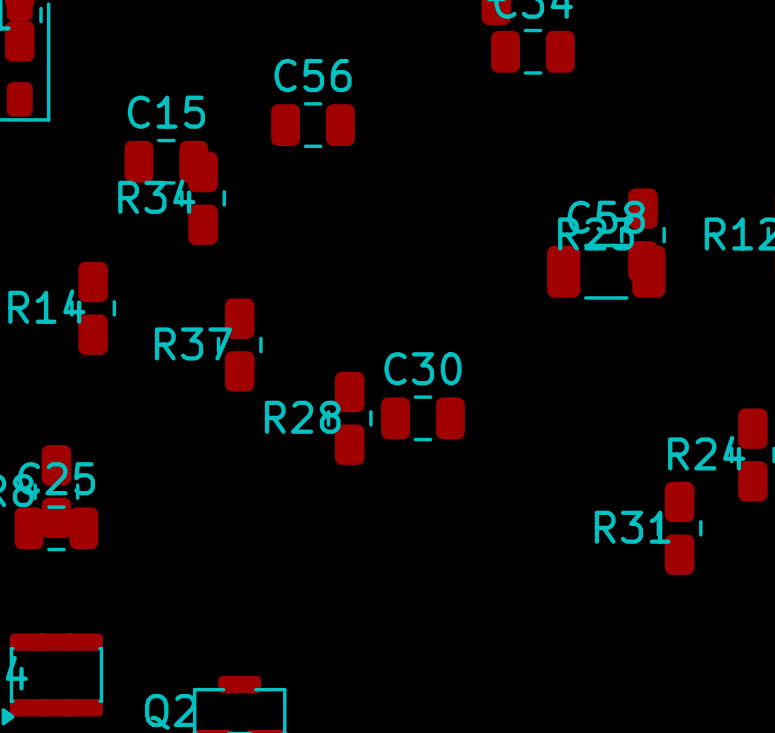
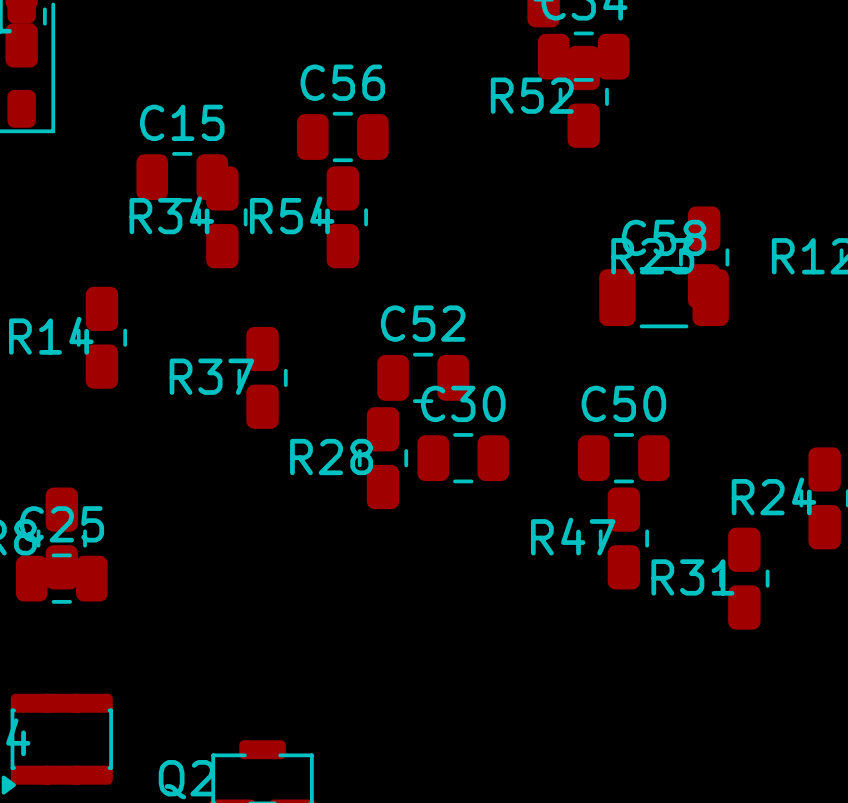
R52: none -> (583, 96)
R54: none -> (342, 217)
C52: none -> (423, 377)
C50: none -> (623, 458)
R47: none -> (623, 538)

